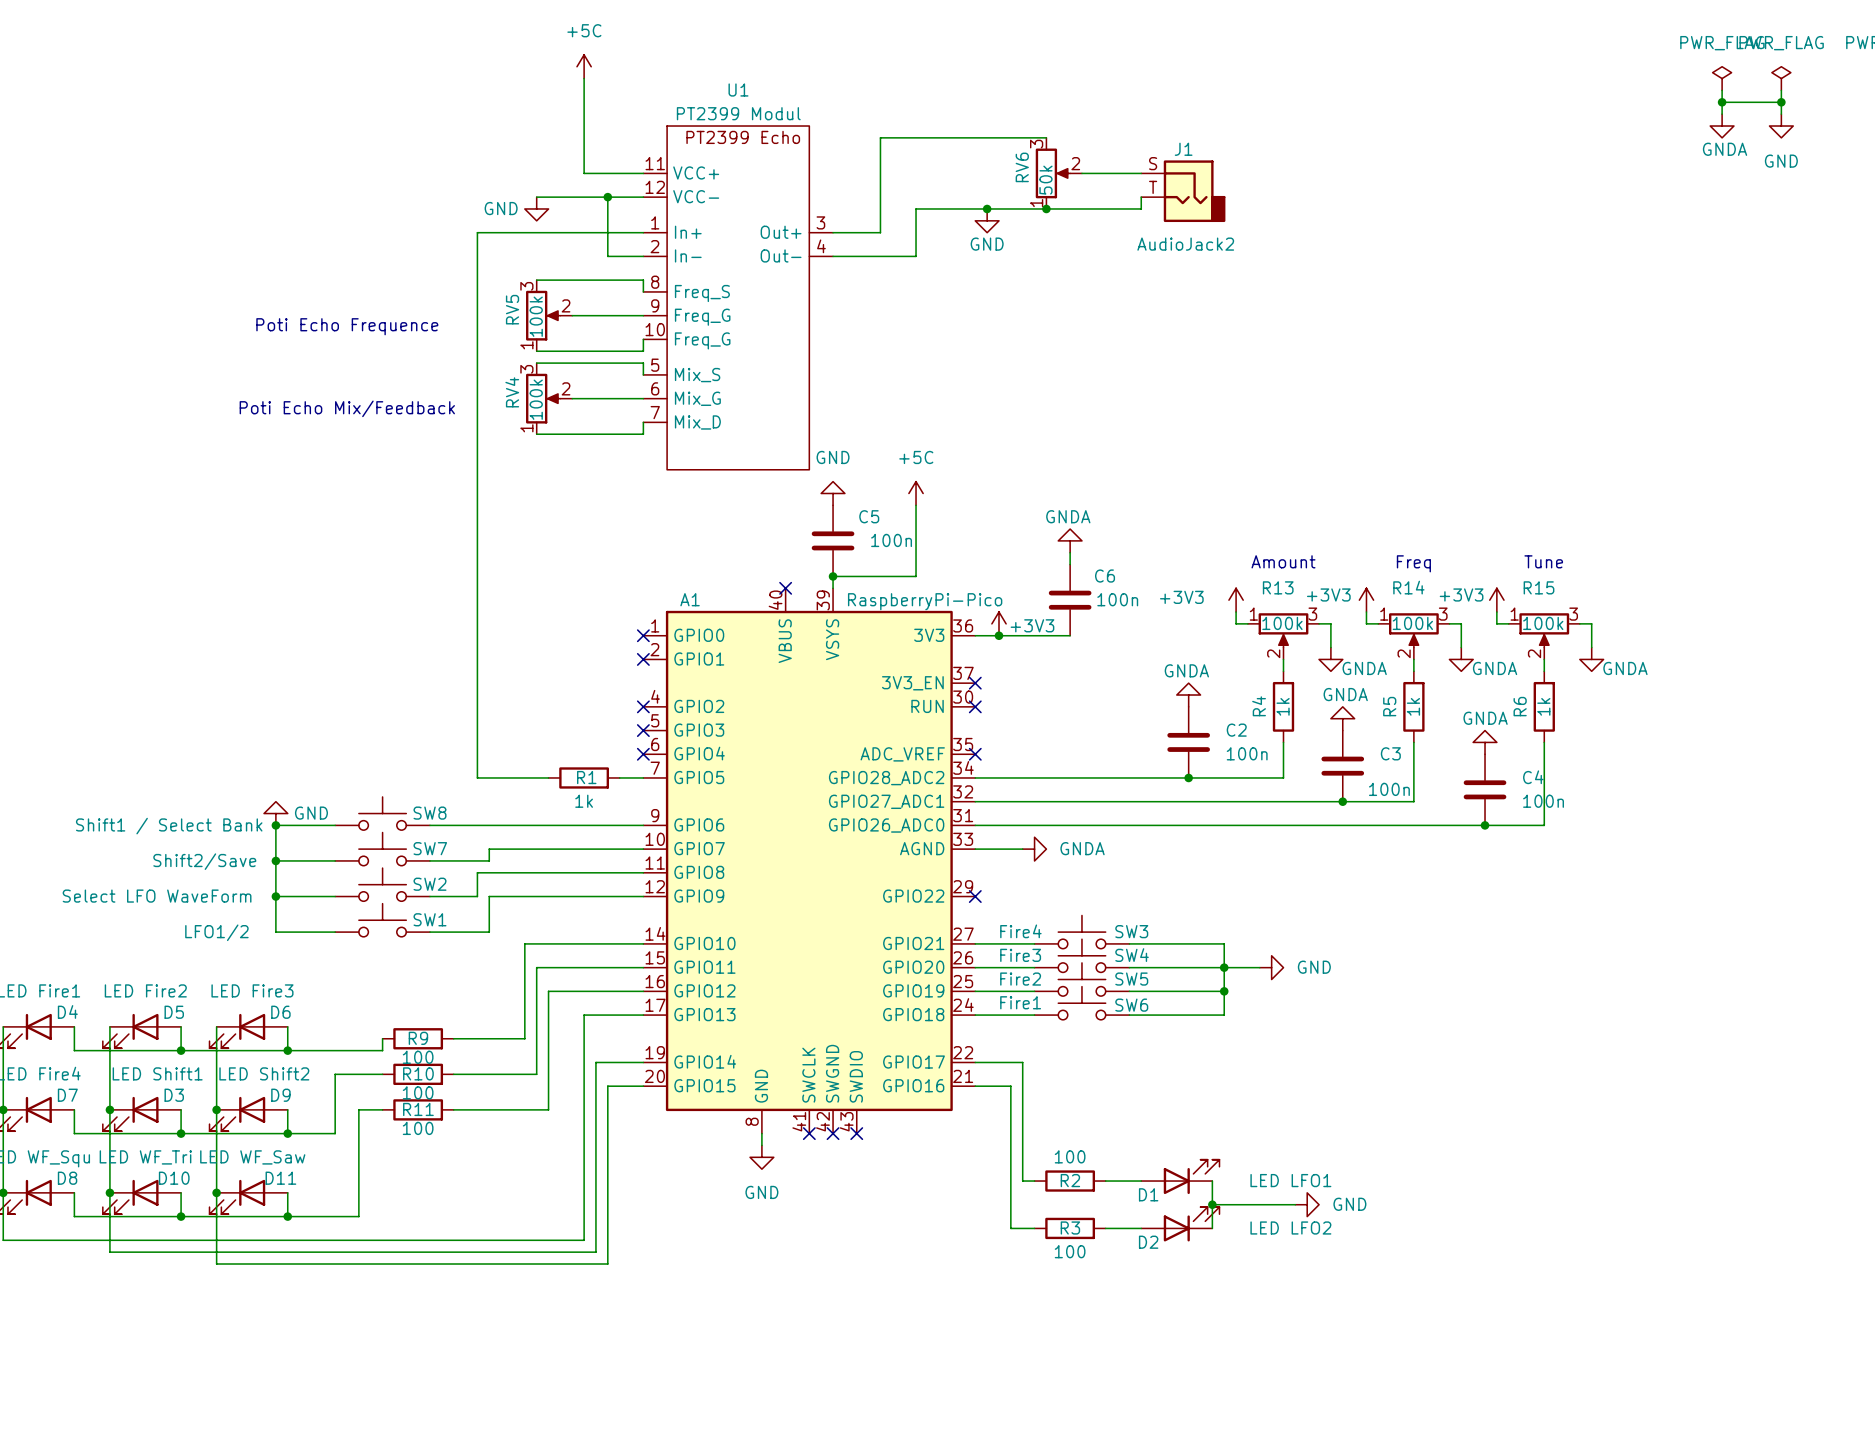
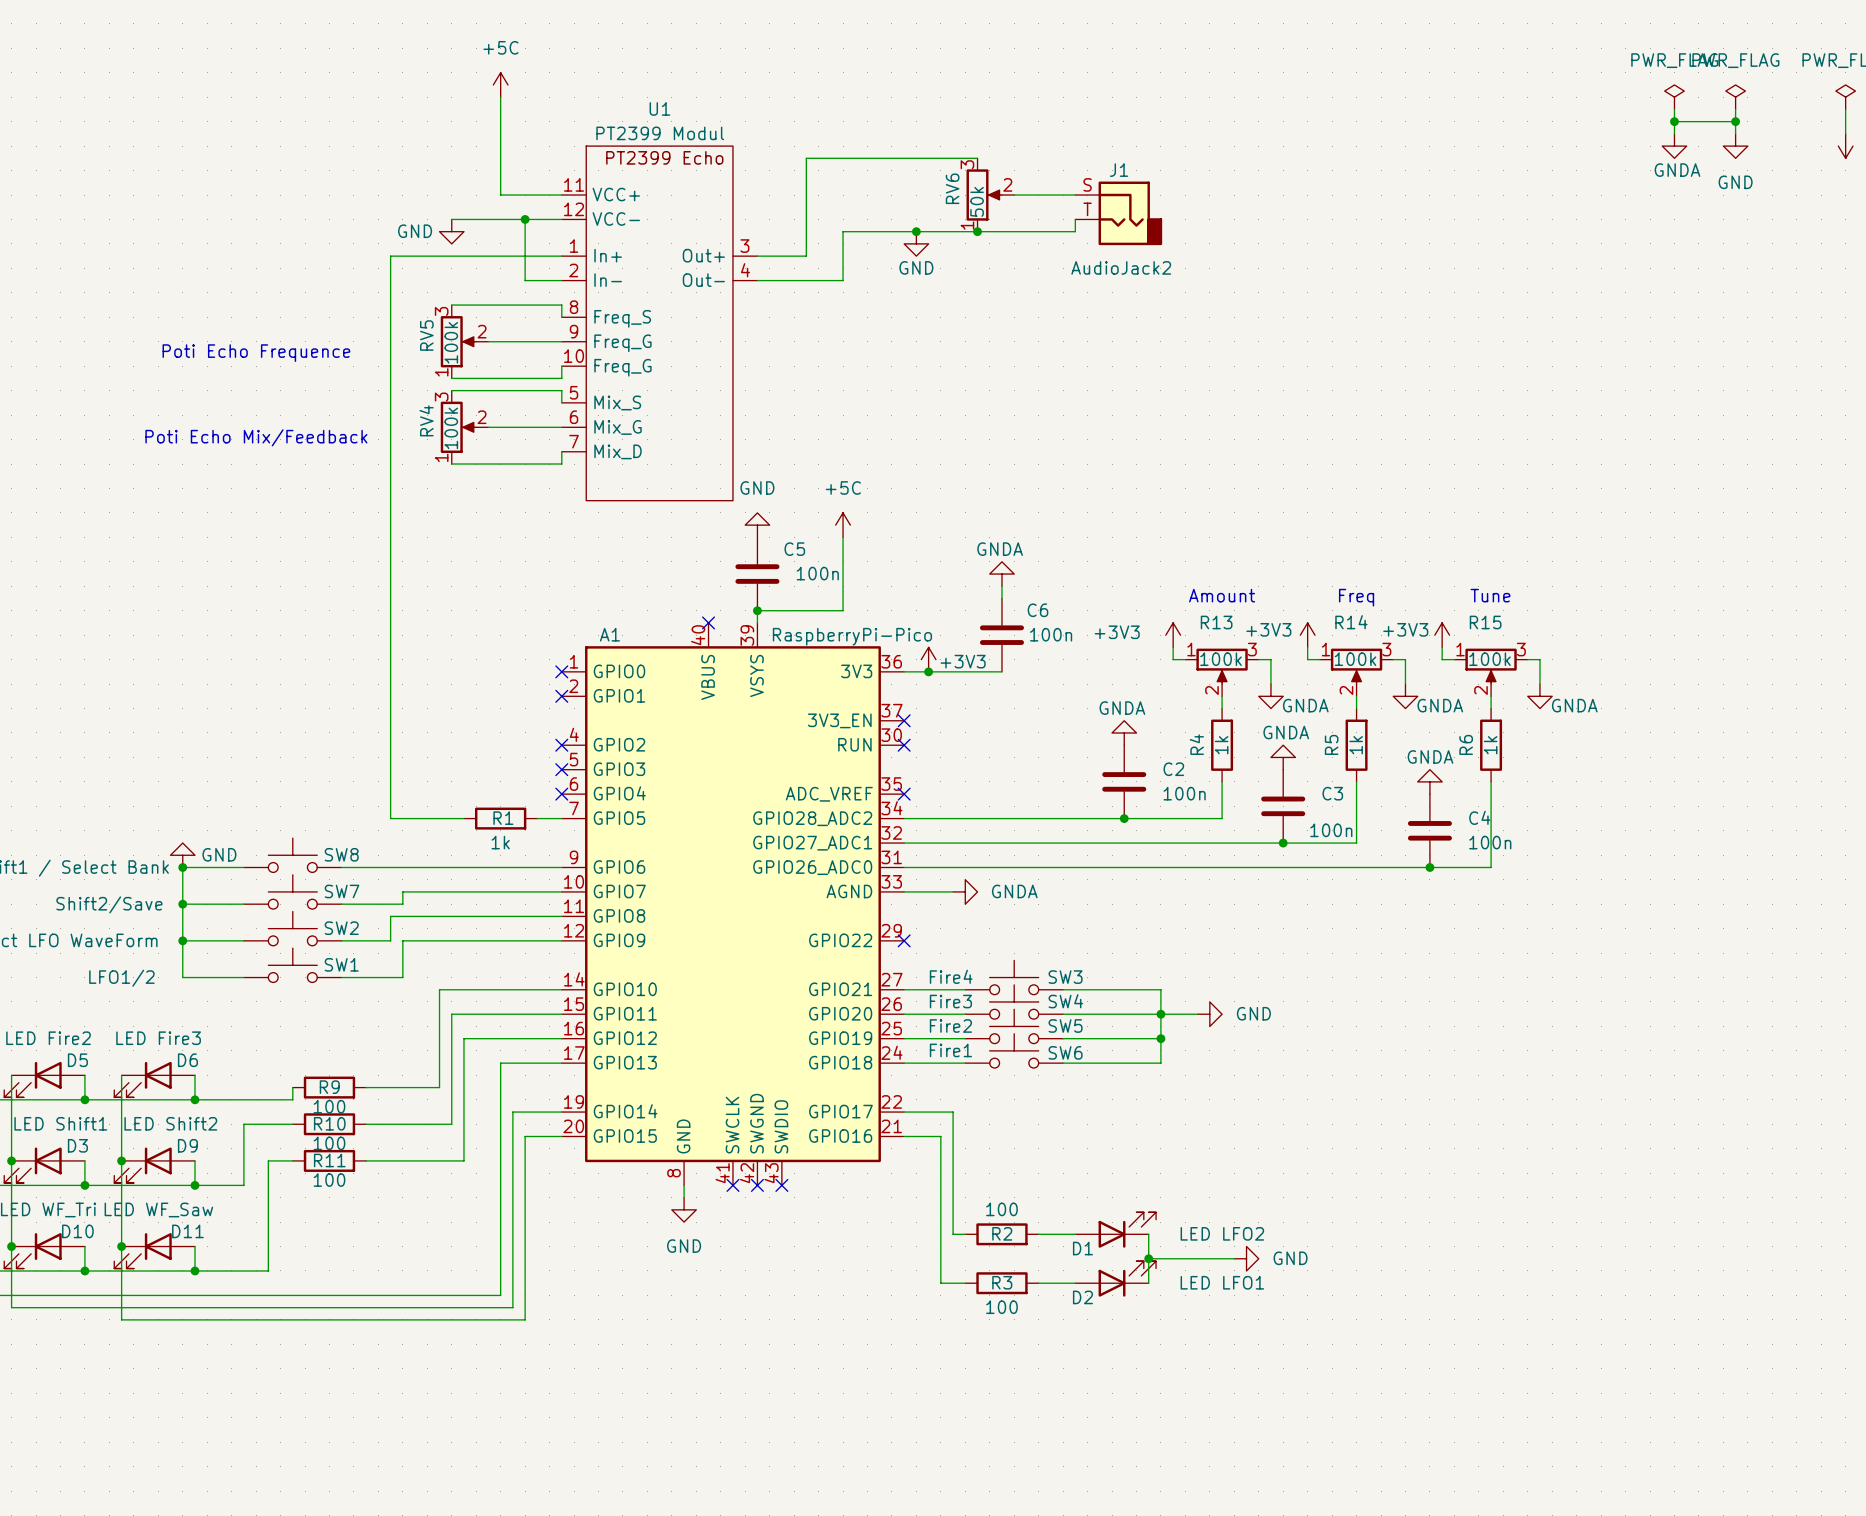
D1 value: LED LFO1 (1290, 1180) -> LED LFO2 (1222, 1233)
D2 value: LED LFO2 (1290, 1227) -> LED LFO1 (1222, 1282)

